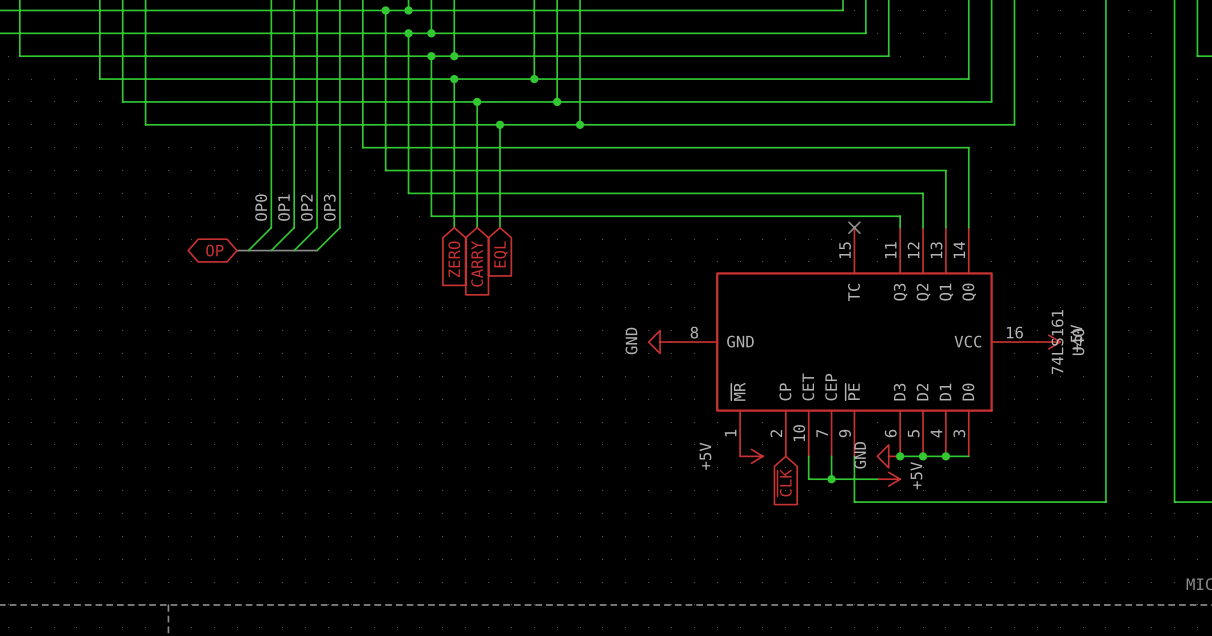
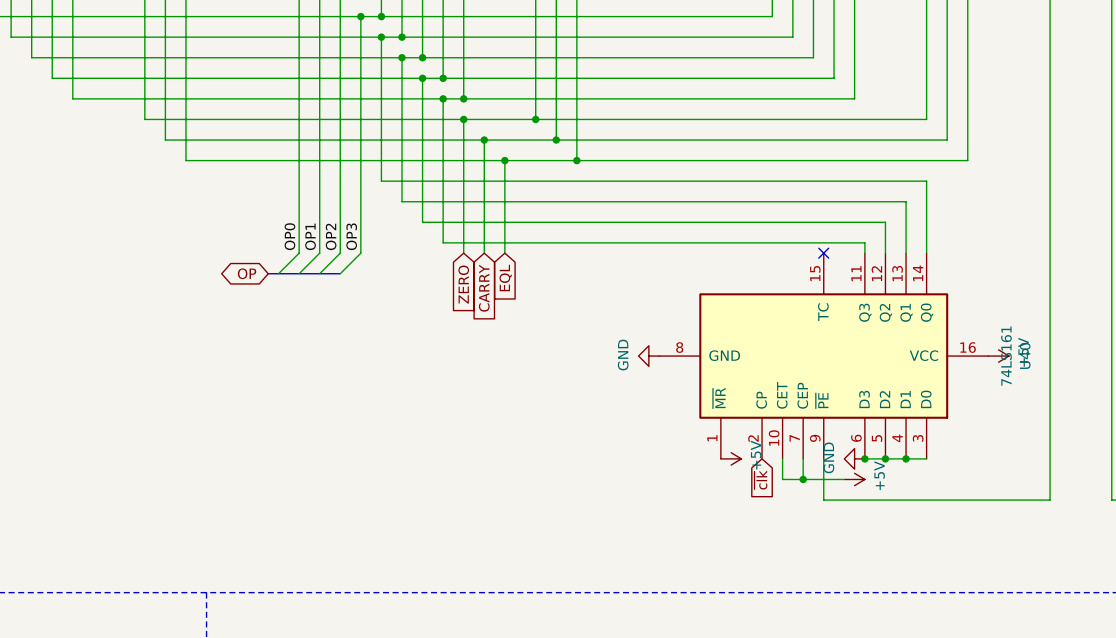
power symbol text position: +5V (705, 456) -> +5V (756, 455)
global label: ~{CLK} (784, 482) -> ~{clk} (760, 480)

